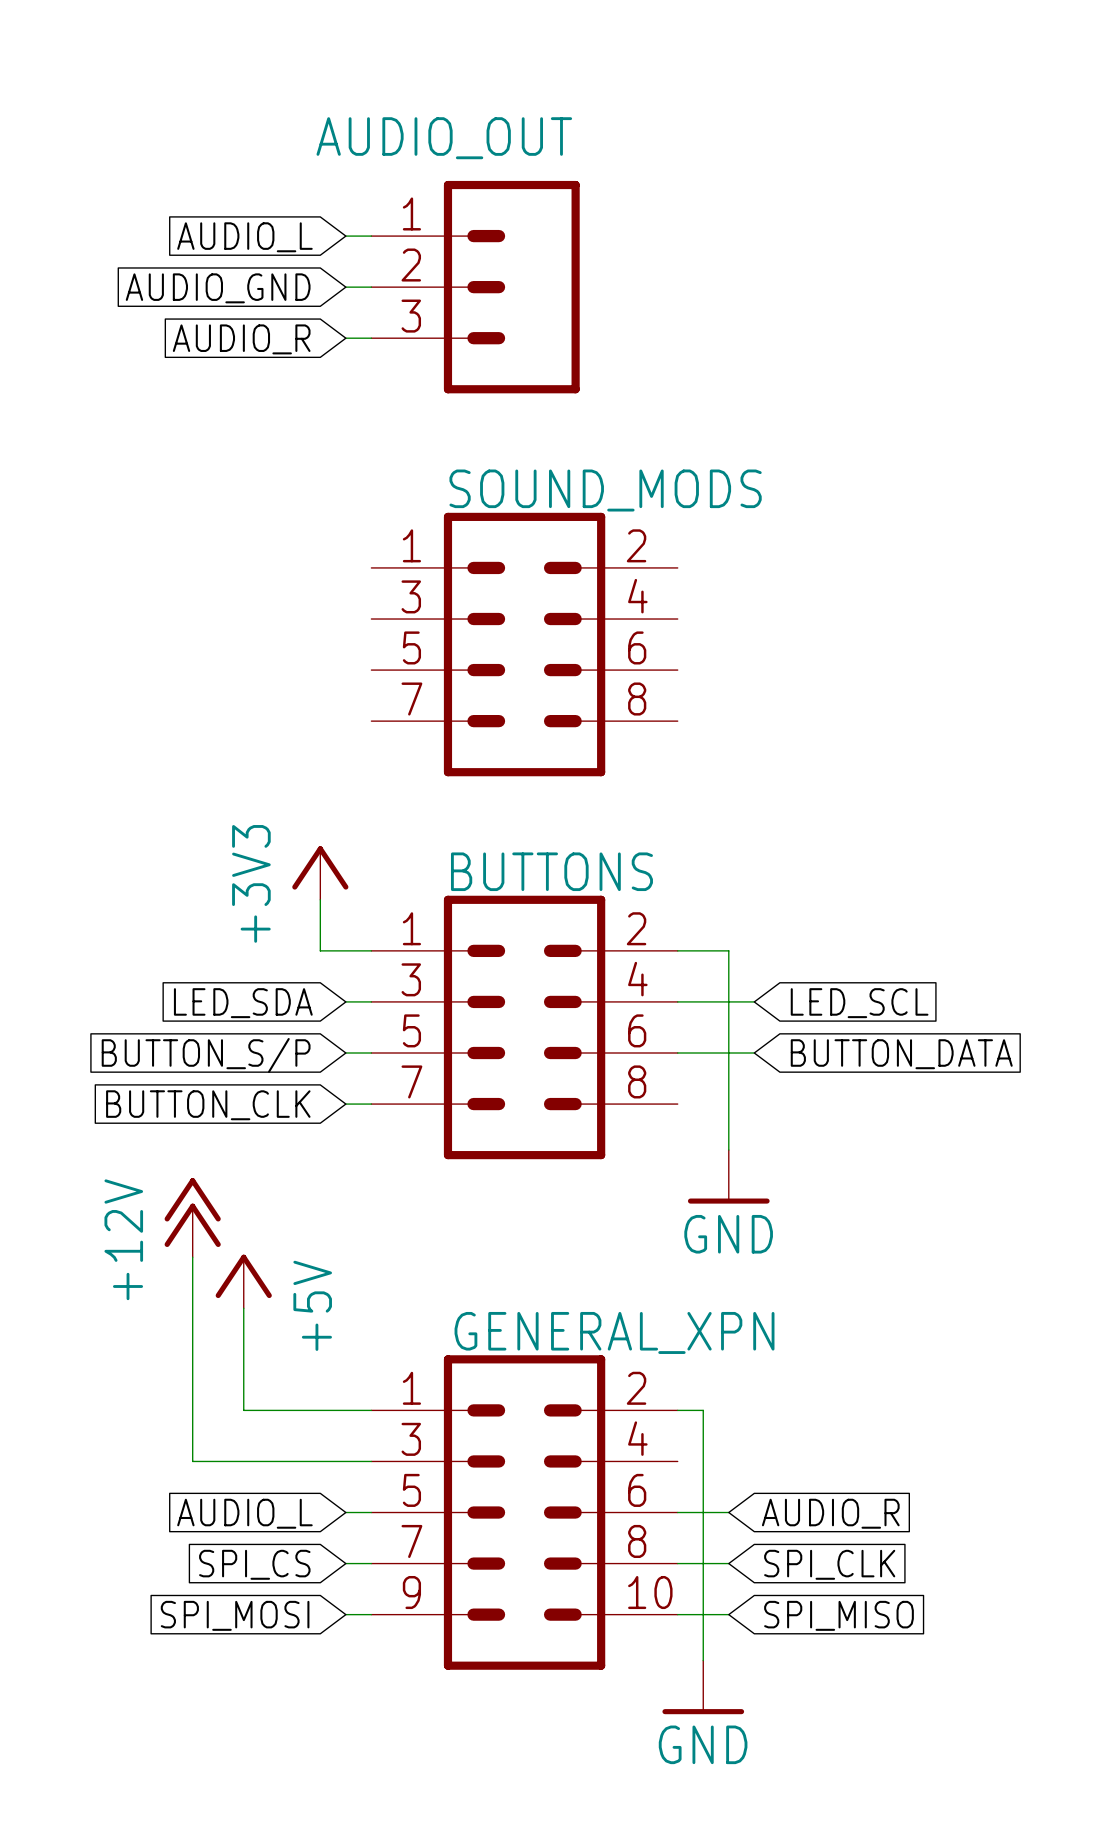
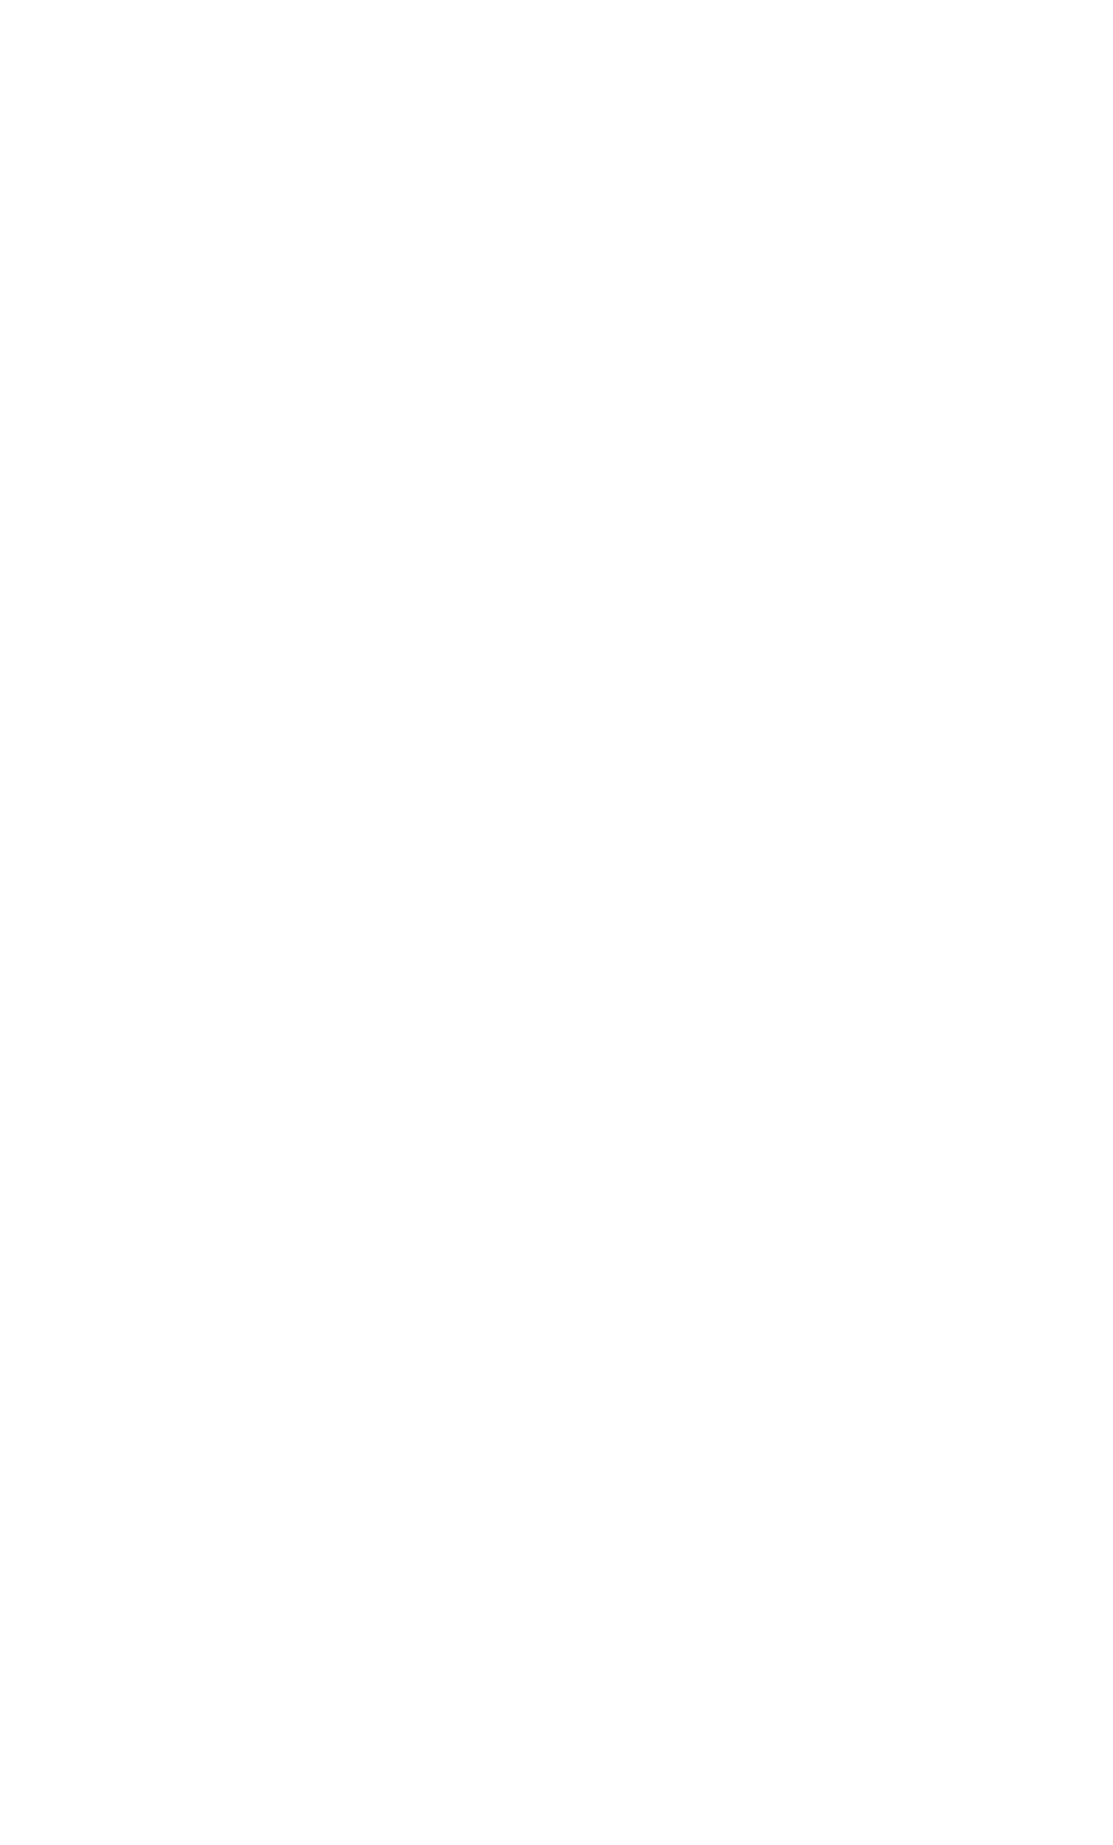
wire: (345, 236) (371, 236) -> none
global label: AUDIO_L (244, 237) -> none
wire: (345, 287) (371, 287) -> none
AUDIO_OUT: (475, 287) -> none
global label: AUDIO_GND (218, 288) -> none
wire: (345, 338) (371, 338) -> none
global label: AUDIO_R (241, 339) -> none
SOUND_MODS: (524, 644) -> none
power symbol: +3V3 (320, 873) -> none
wire: (320, 899) (320, 950) (371, 950) -> none
wire: (677, 950) (728, 950) (728, 1150) -> none
wire: (345, 1001) (371, 1001) -> none
wire: (677, 1001) (754, 1001) -> none
global label: LED_SDA (243, 1003) -> none
global label: LED_SCL (859, 1003) -> none
BUTTONS: (524, 1027) -> none
wire: (345, 1053) (371, 1053) -> none
wire: (677, 1053) (754, 1053) -> none
global label: BUTTON_DATA (901, 1054) -> none
global label: BUTTON_S/P (206, 1055) -> none
wire: (345, 1104) (371, 1104) -> none
global label: BUTTON_CLK (208, 1105) -> none
power symbol: GND (728, 1176) -> none
power symbol: +12V (192, 1217) -> none
wire: (192, 1257) (192, 1461) (371, 1461) -> none
power symbol: +5V (243, 1281) -> none
wire: (243, 1308) (243, 1410) (371, 1410) -> none
wire: (677, 1410) (703, 1410) (703, 1660) -> none
wire: (345, 1512) (371, 1512) -> none
GENERAL_XPN: (524, 1512) -> none
wire: (677, 1512) (728, 1512) -> none
global label: AUDIO_L (244, 1513) -> none
global label: AUDIO_R (830, 1513) -> none
wire: (345, 1563) (371, 1563) -> none
wire: (677, 1563) (728, 1563) -> none
global label: SPI_CS (254, 1564) -> none
global label: SPI_CLK (829, 1564) -> none
wire: (345, 1614) (371, 1614) -> none
wire: (677, 1614) (728, 1614) -> none
global label: SPI_MOSI (235, 1615) -> none
global label: SPI_MISO (838, 1615) -> none
power symbol: GND (703, 1687) -> none

